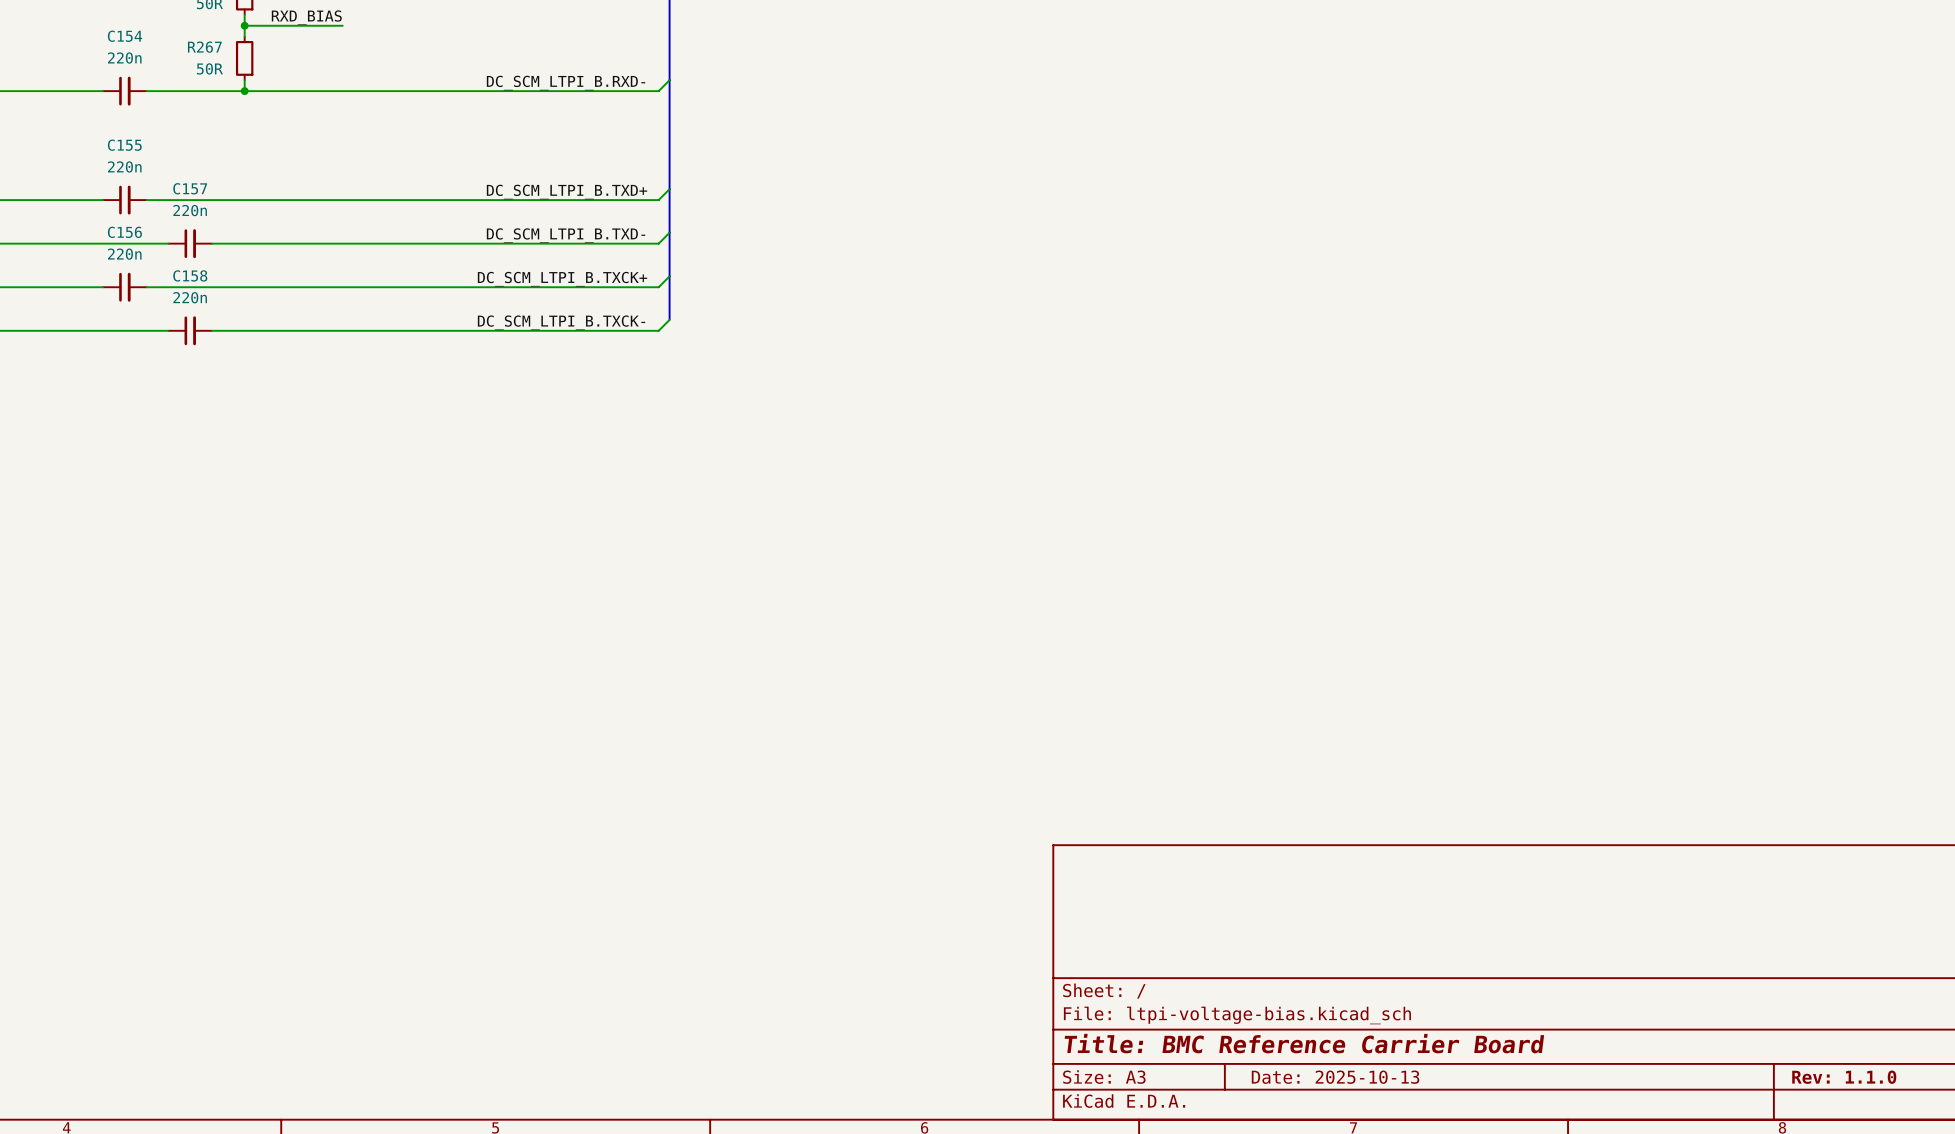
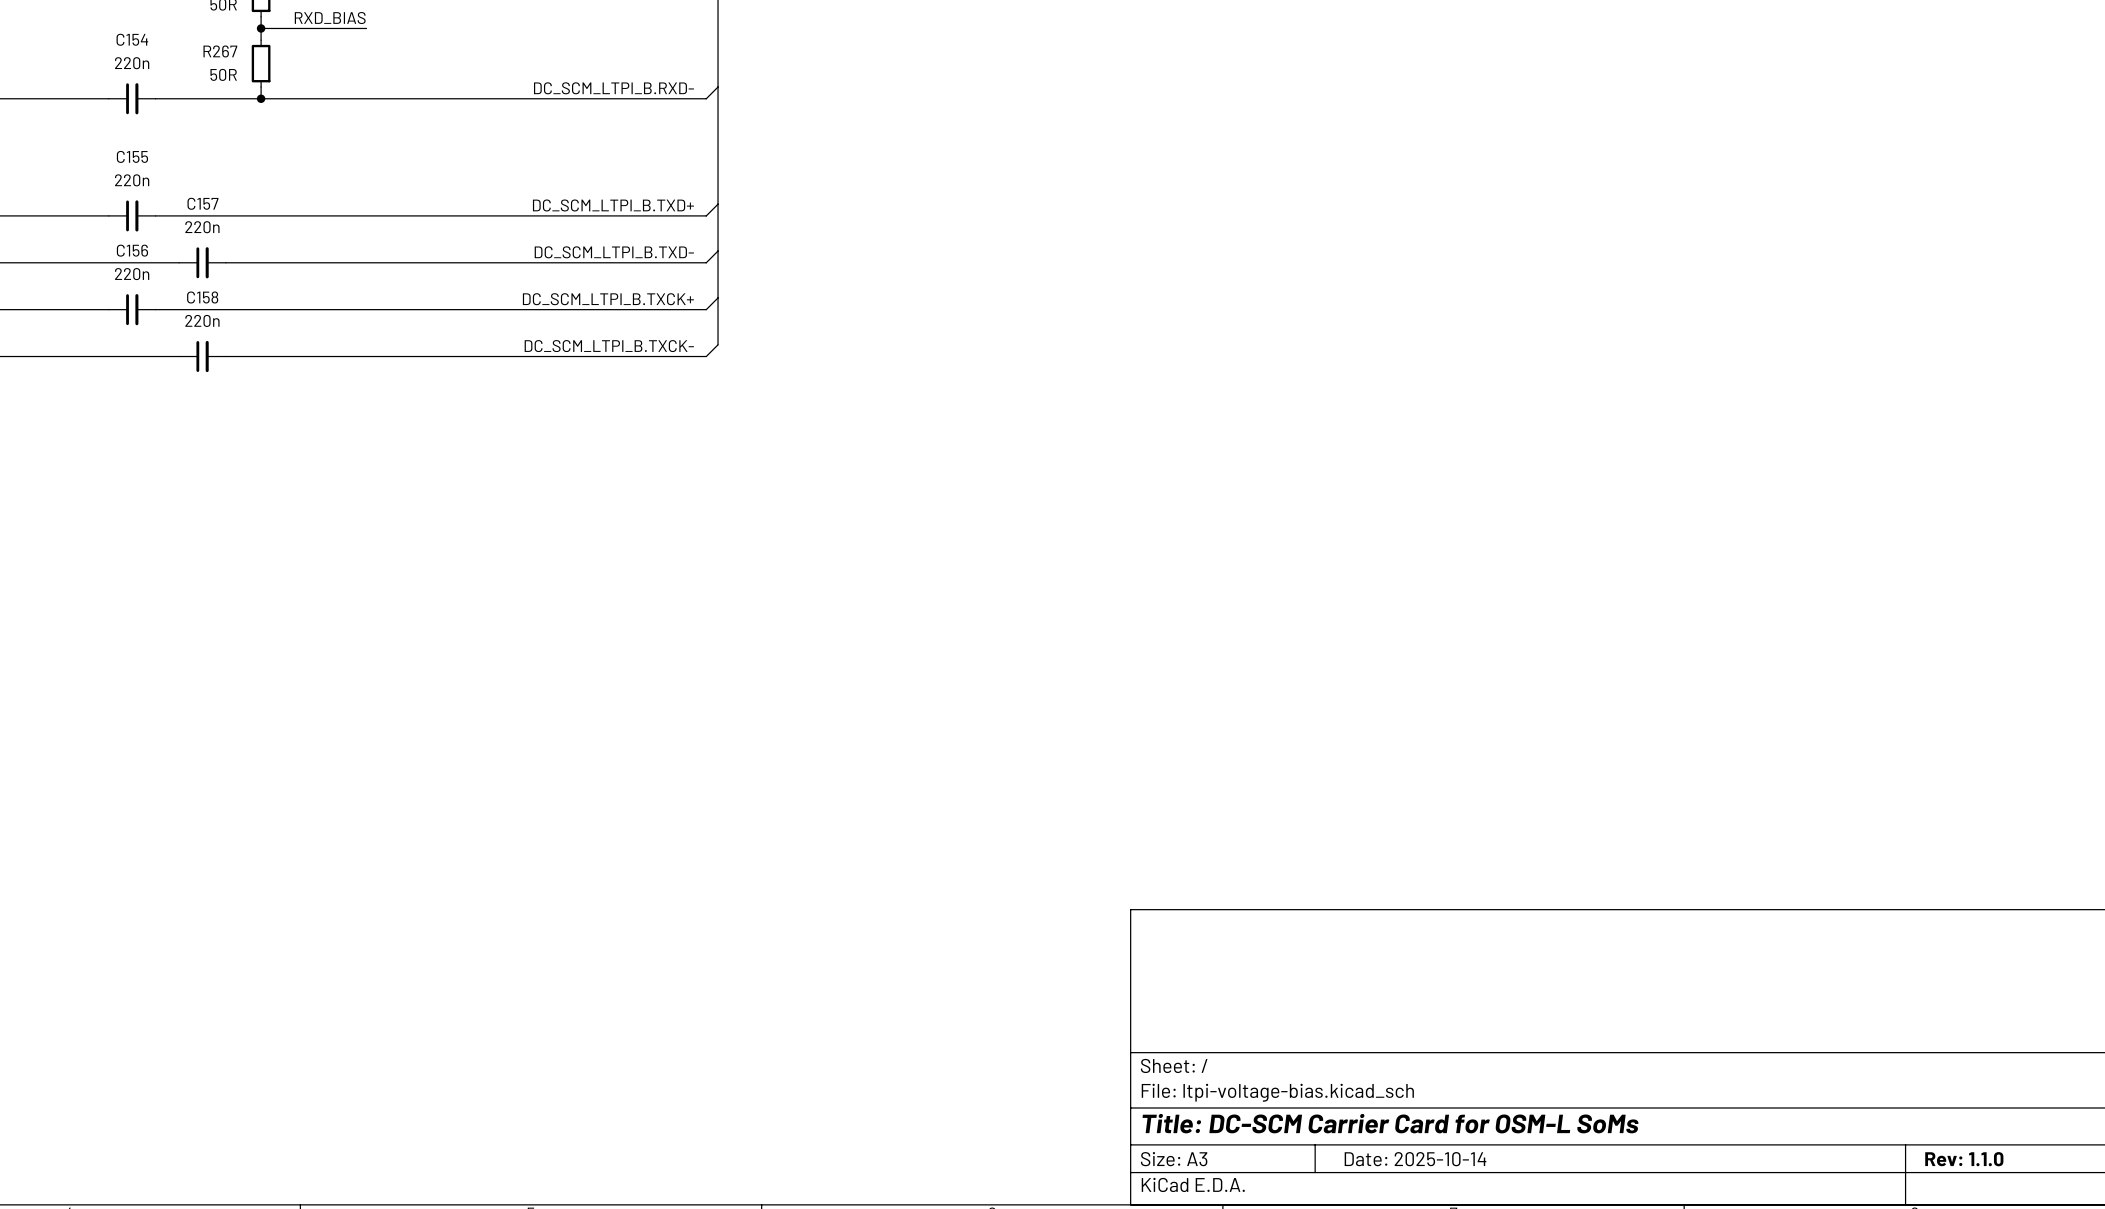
title block: Title: BMC Reference Carrier Board (1304, 1043) -> Title: DC-SCM Carrier Card for OSM-L SoMs (1390, 1123)
title block: Date: 2025-10-13 (1335, 1077) -> Date: 2025-10-14 (1415, 1159)

